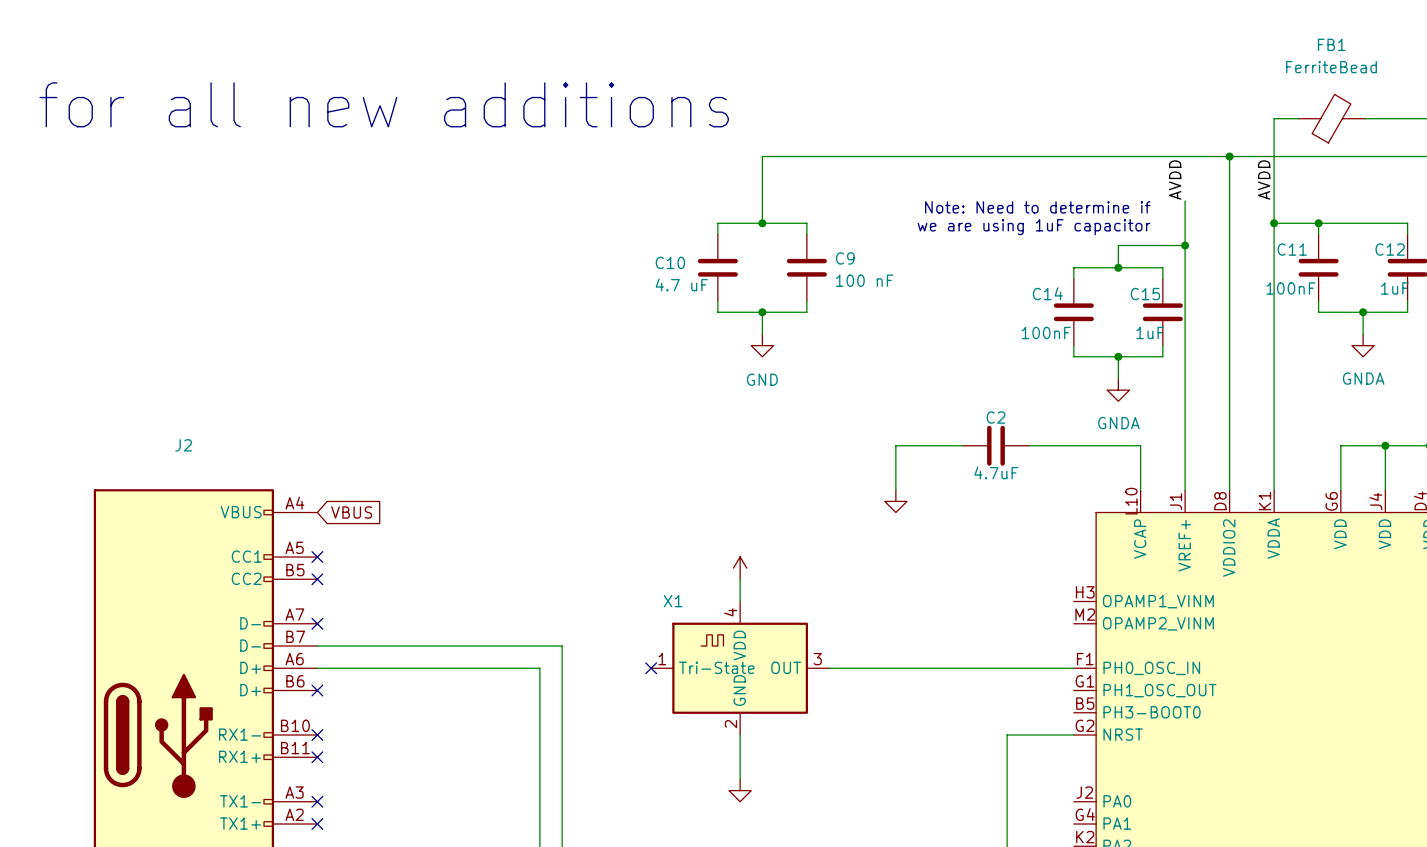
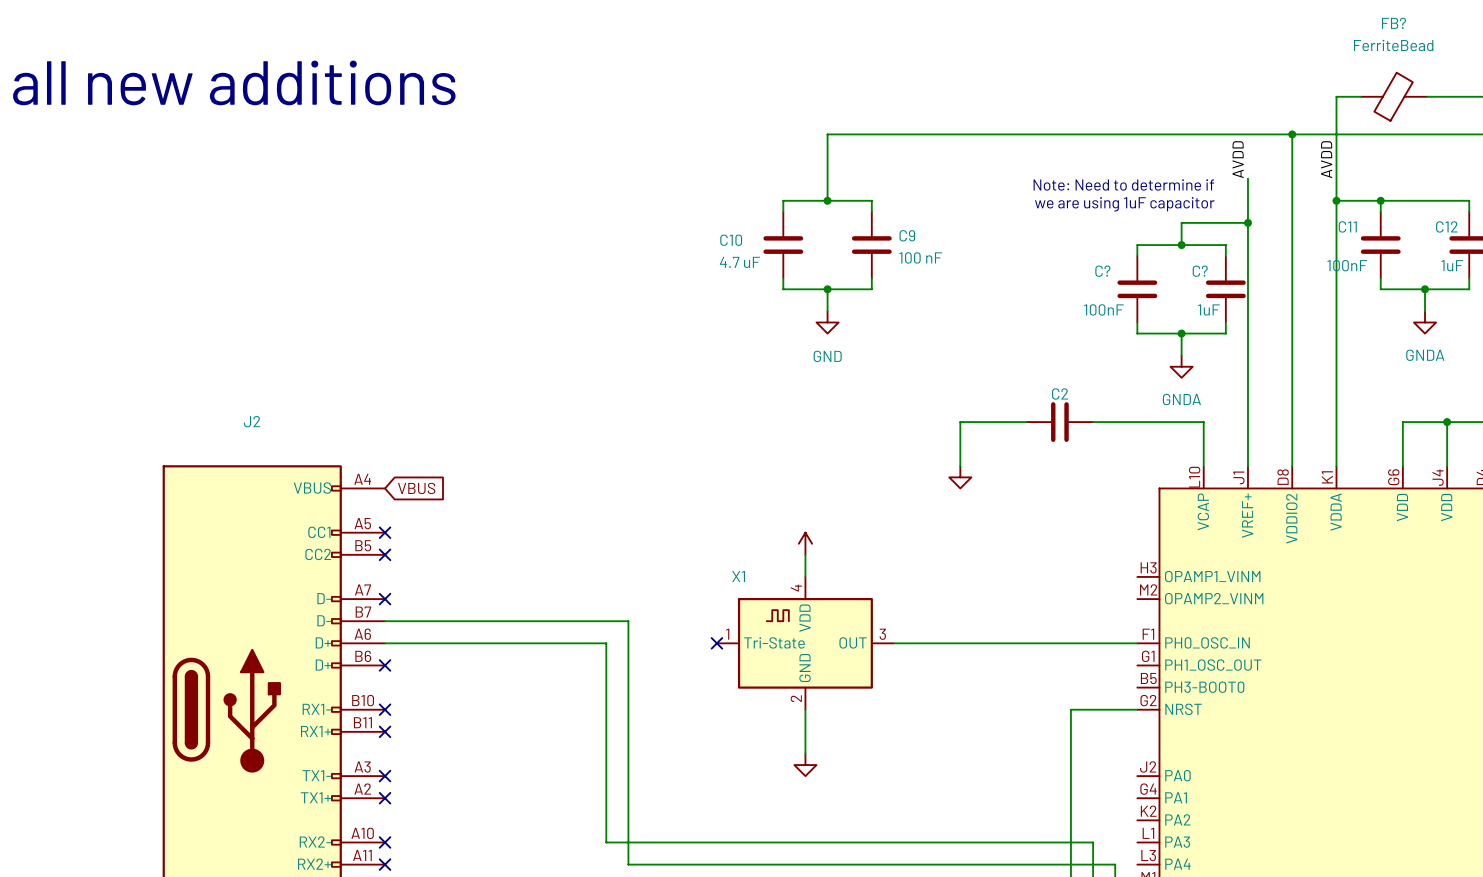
FB1 name: FB1 (1331, 44) -> FB? (1393, 23)
C14 name: C14 (1047, 293) -> C? (1102, 271)
C15 name: C15 (1145, 294) -> C? (1200, 271)
C2 value: 4.7uF (996, 472) -> none

